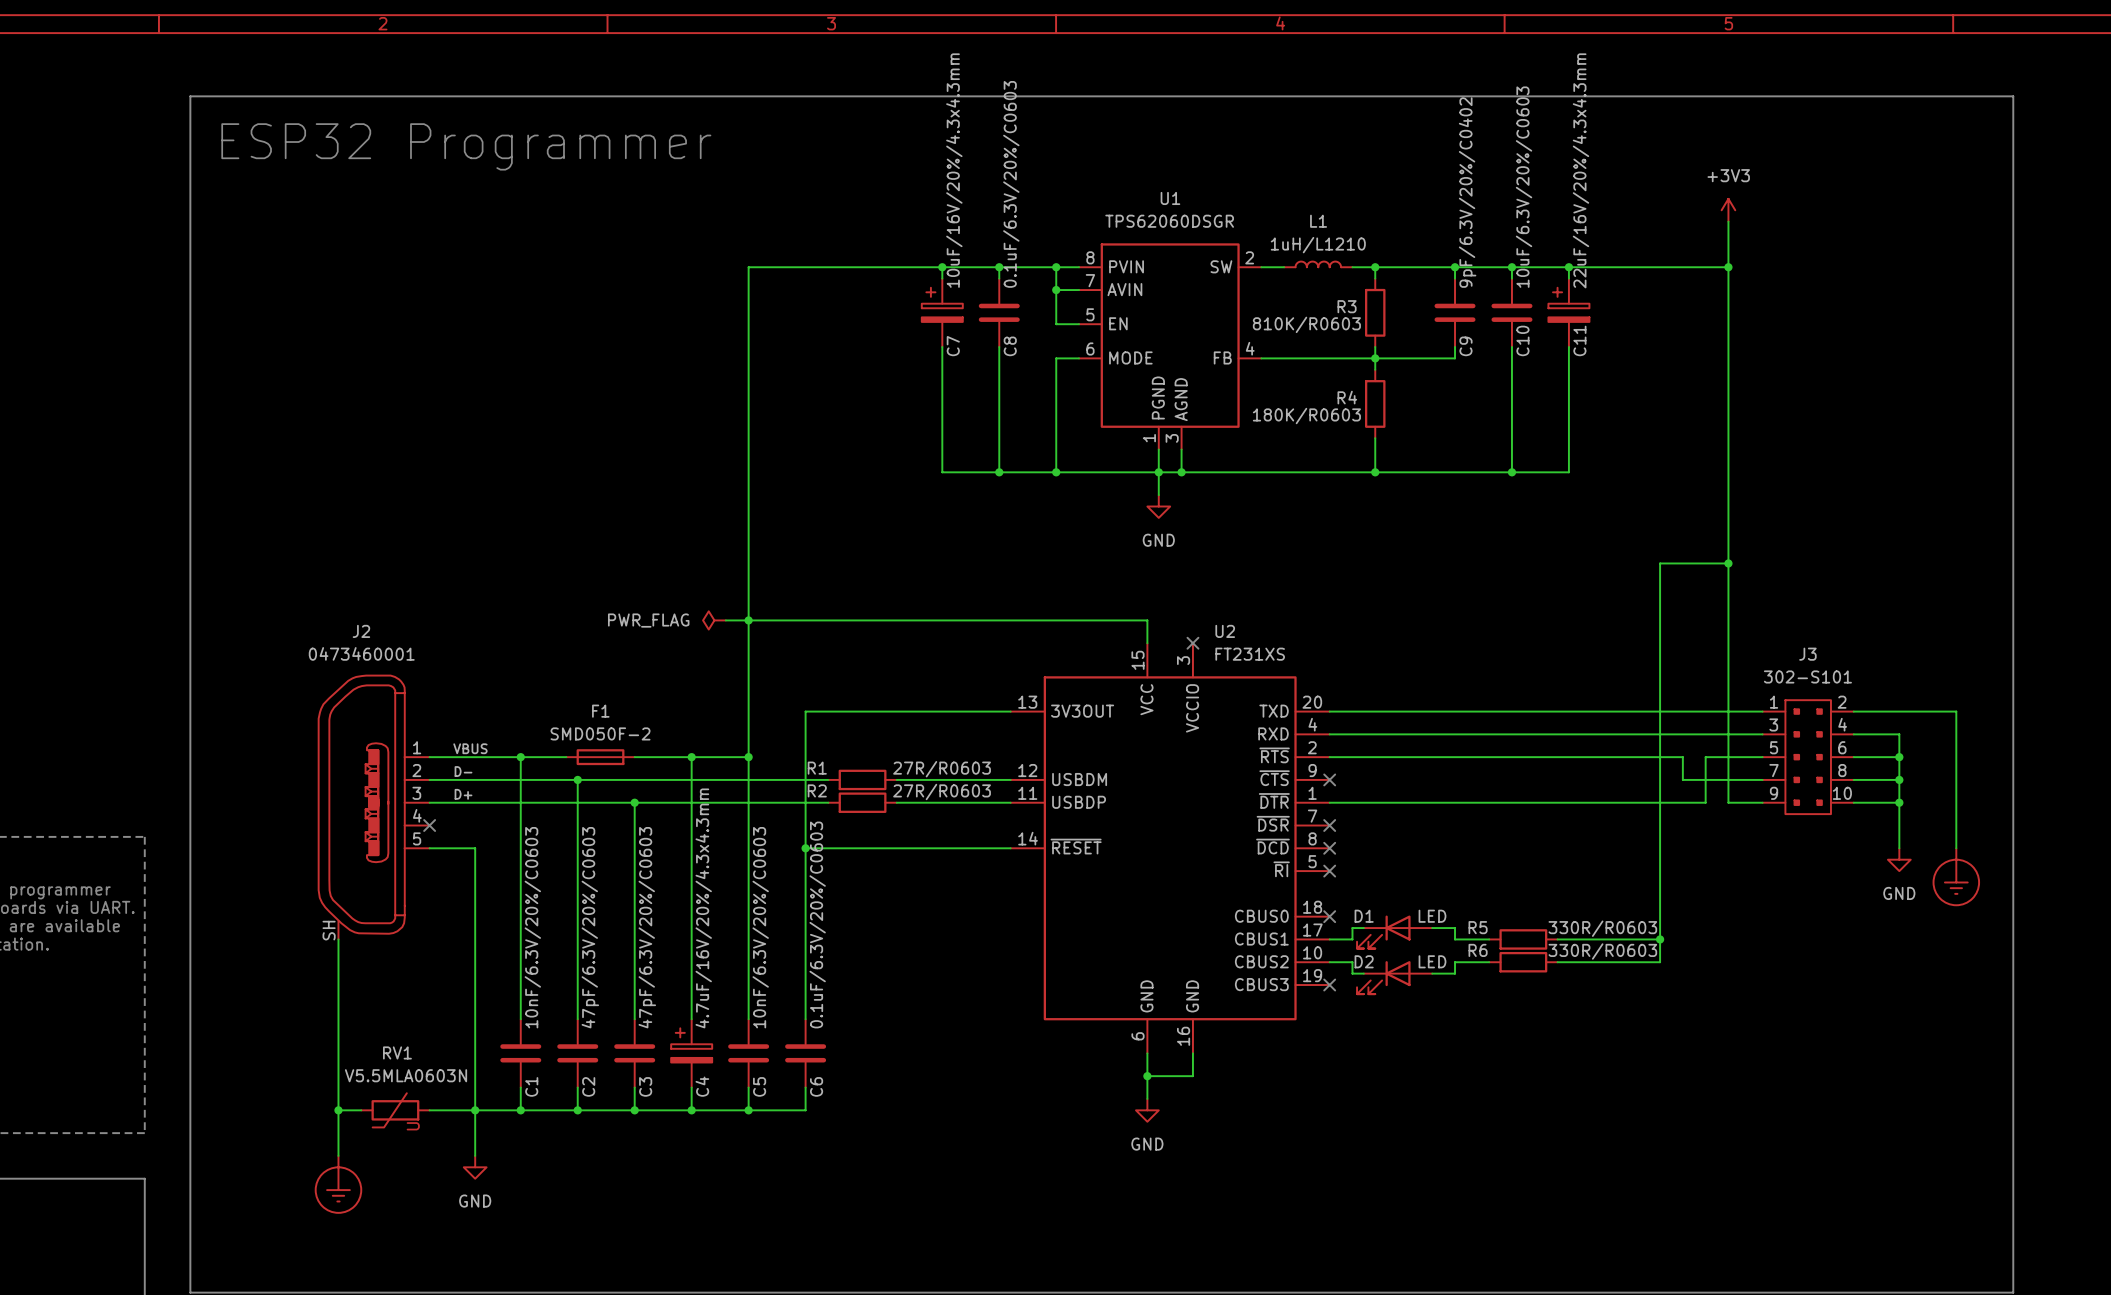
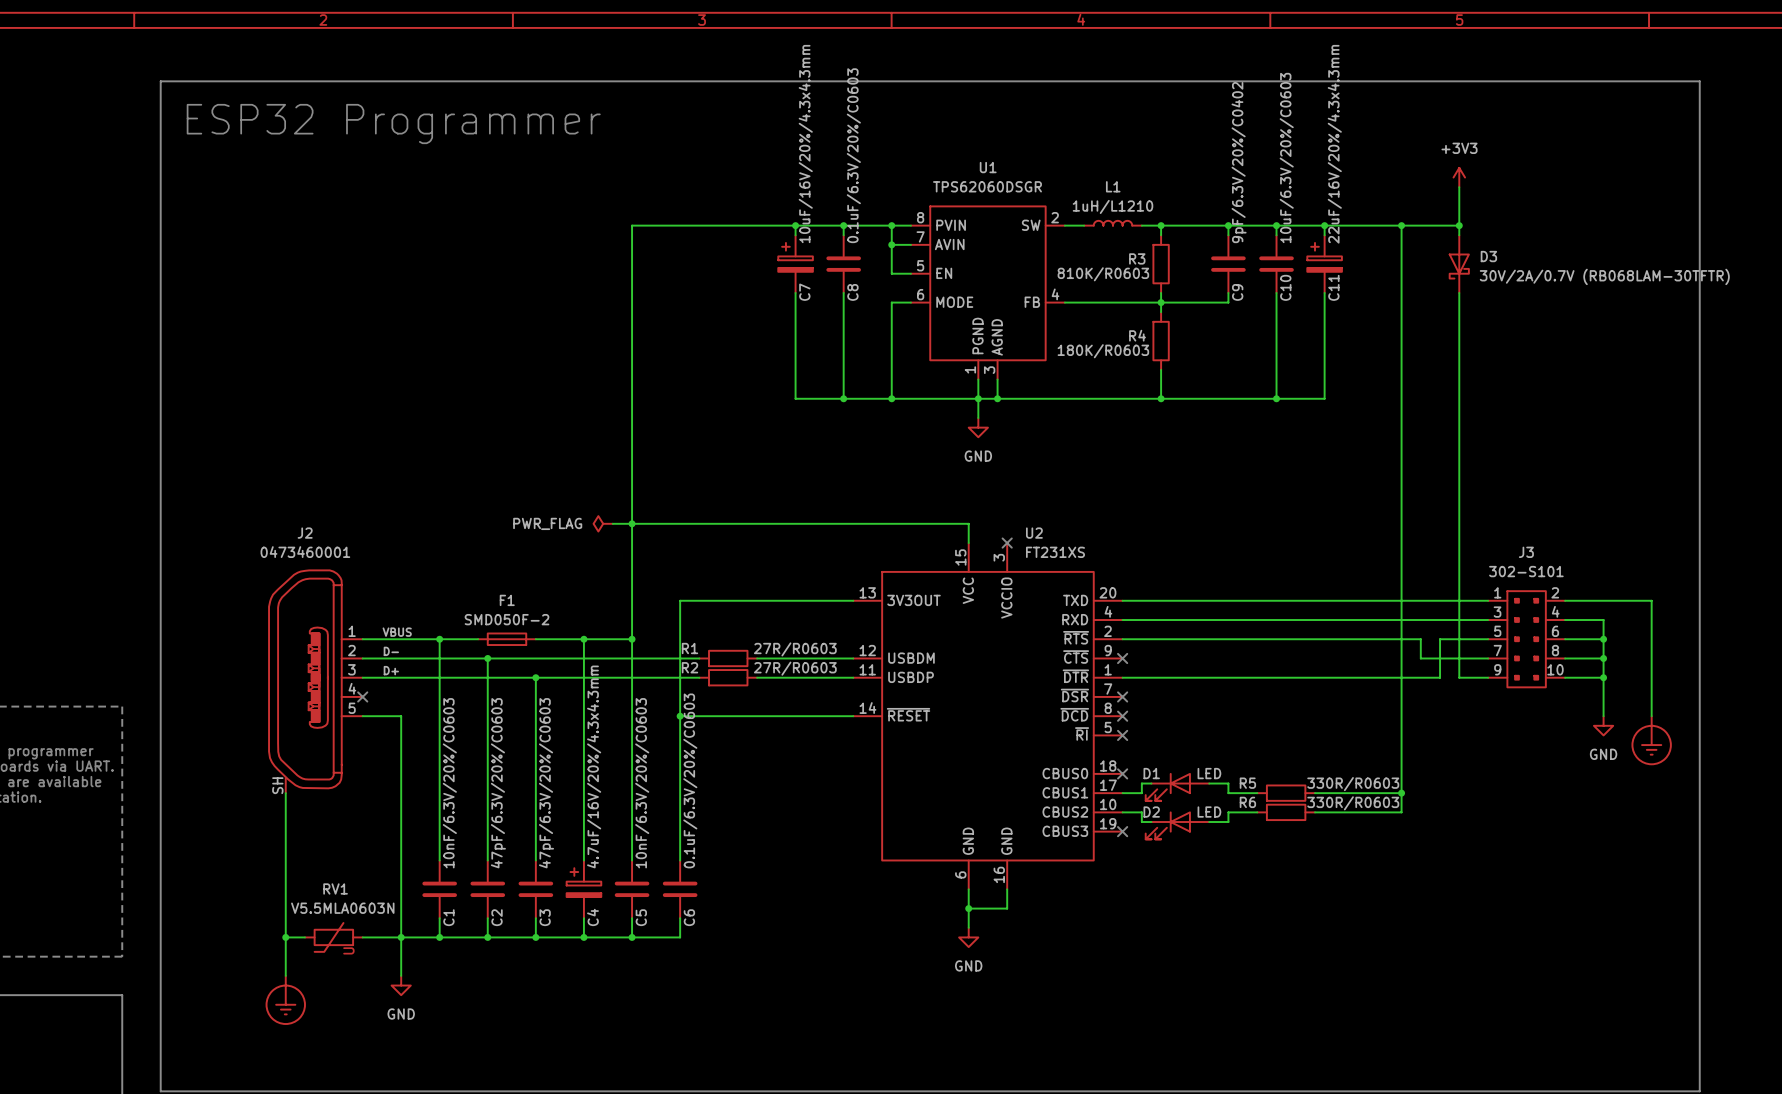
junction: none -> (1401, 225)
D3: none -> 30V/2A/0.7V (RB068LAM-30TFTR) (1459, 264)
wire: (1660, 563) (1728, 563) -> (1401, 475) (1401, 225)
junction: (1728, 563) -> none

